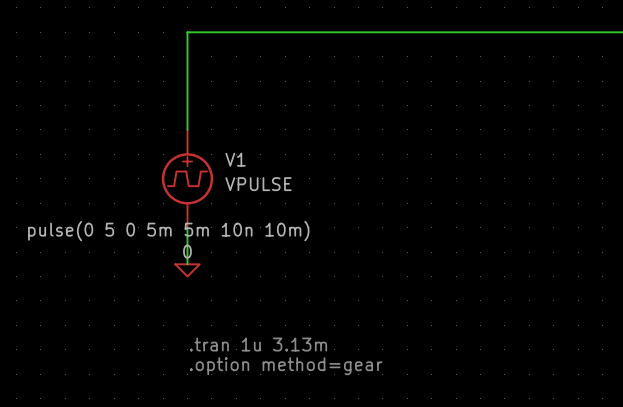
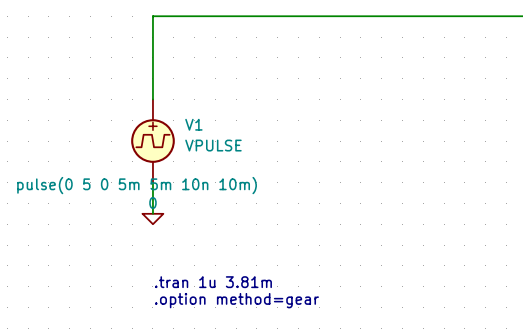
text: .tran 1u 3.13m (258, 344) -> .tran 1u 3.81m (213, 282)

